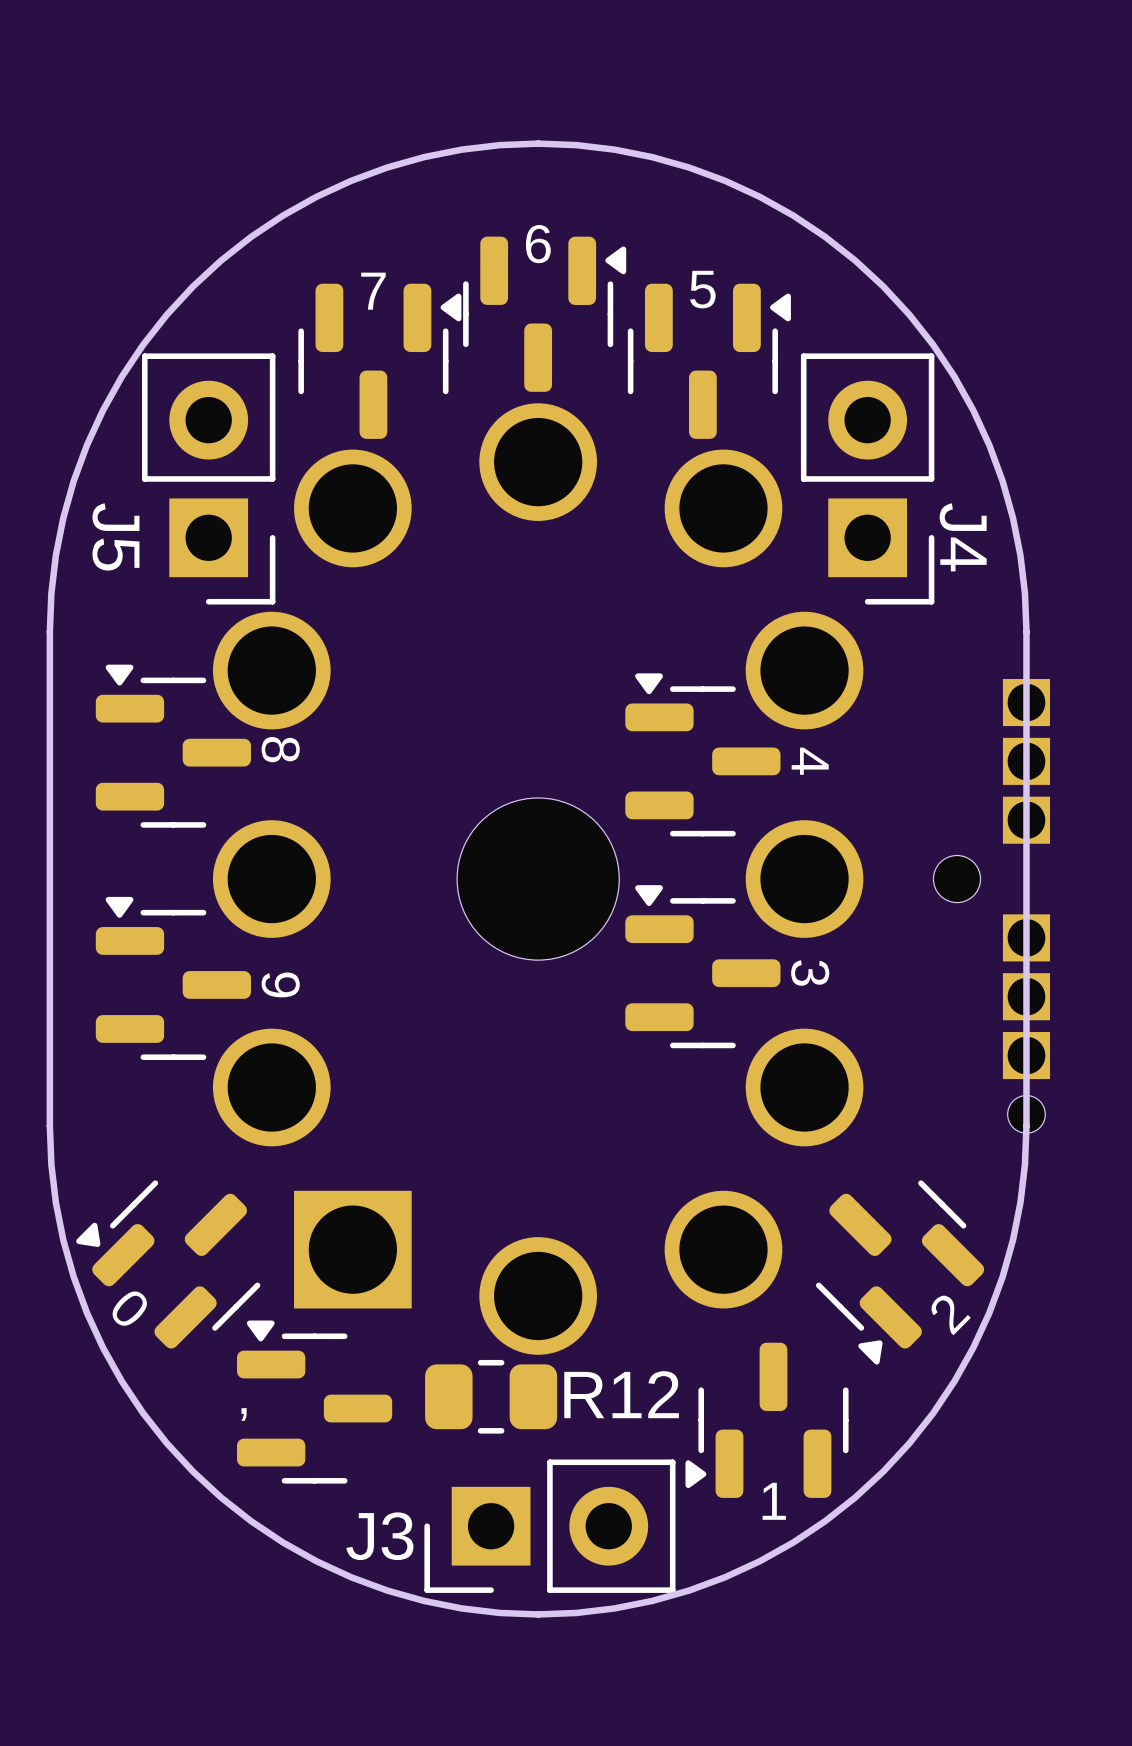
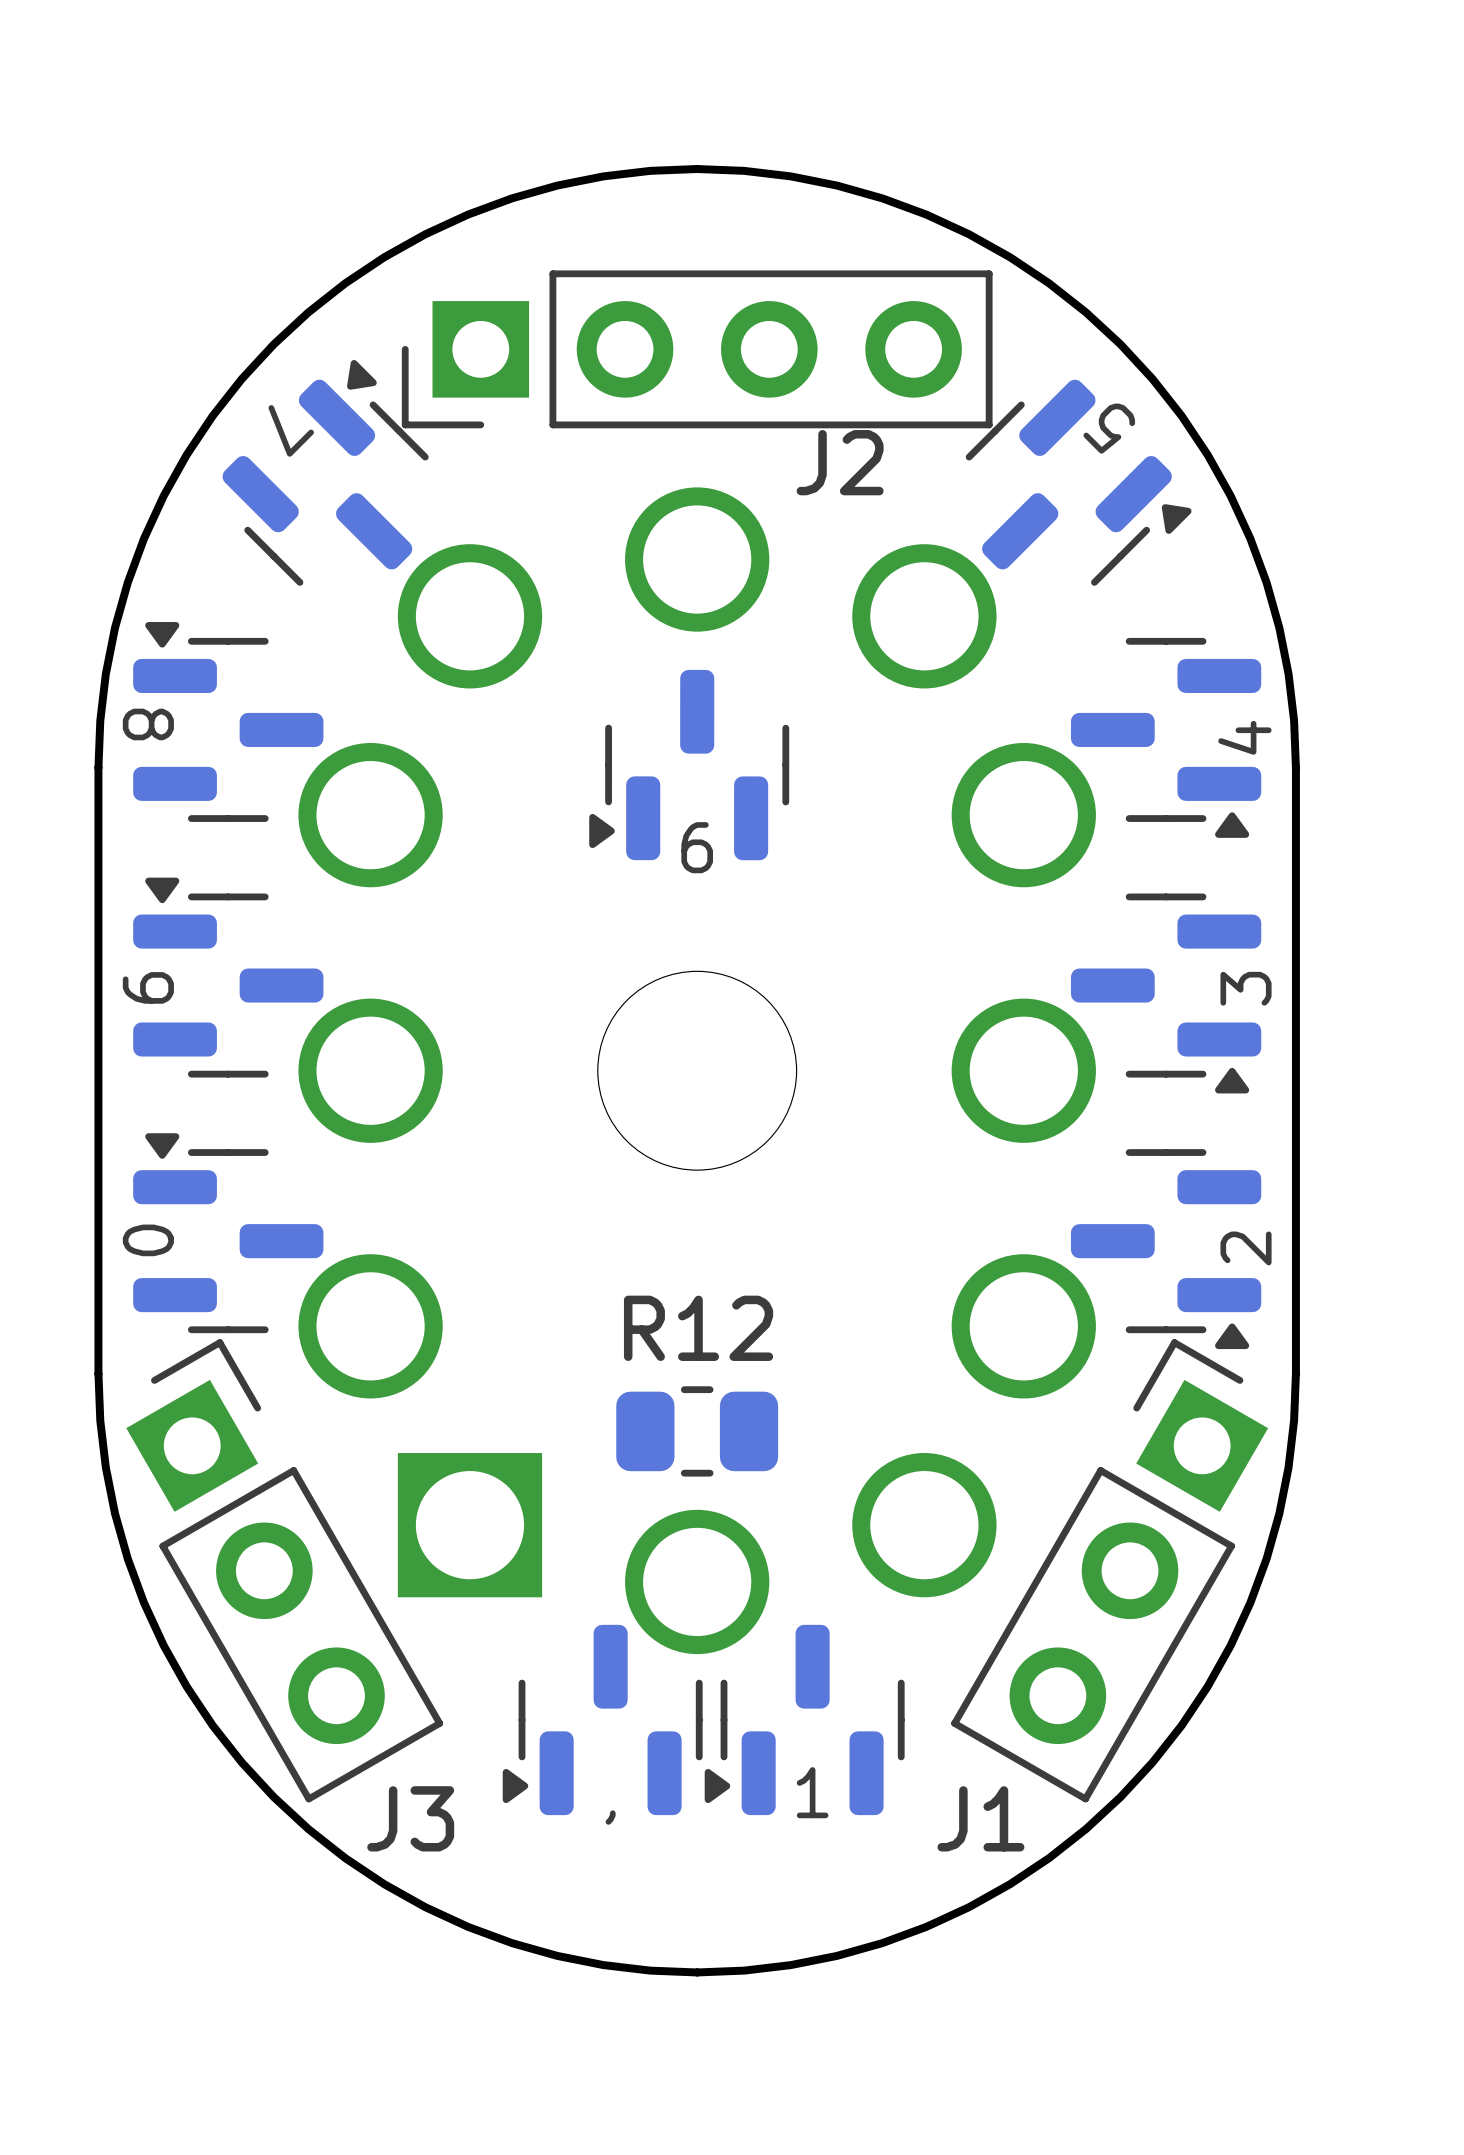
text position: 6 (538, 244) -> 6 (697, 847)
text rotation: 0° (702, 289) -> 135° counterclockwise (1109, 428)
text position: 5 (702, 289) -> 5 (1109, 428)
J2: none -> (697, 349)
text rotation: 0° (373, 291) -> 135° clockwise (291, 430)
text position: 7 (373, 291) -> 7 (291, 430)
part: (544, 314) -> none
part: (379, 361) -> none
part: (709, 361) -> none
part: none -> (325, 472)
part: none -> (1078, 482)
J5: (208, 478) -> none
J4: (867, 478) -> none
part: none -> (228, 721)
part: none -> (1166, 737)
part: none -> (689, 765)
part position: (173, 746) -> (228, 977)
text position: 8 (280, 749) -> 8 (148, 724)
part: (702, 754) -> none
text rotation: 0° (810, 761) -> 180° (1244, 737)
text position: 4 (810, 761) -> 4 (1244, 737)
part: none -> (1166, 993)
part: (991, 906) -> none
part: (702, 966) -> none
text rotation: 0° (810, 973) -> 180° (1246, 988)
text position: 3 (810, 973) -> 3 (1246, 988)
part position: (173, 978) -> (228, 1233)
text position: 9 (280, 984) -> 9 (148, 987)
part: none -> (1166, 1249)
part: (168, 1264) -> none
part: (900, 1272) -> none
J1: none -> (1109, 1570)
text rotation: 0° (129, 1308) -> 45° clockwise (148, 1240)
text position: 0 (129, 1308) -> 0 (148, 1240)
text rotation: 0° (950, 1315) -> 45° counterclockwise (1246, 1248)
text position: 2 (950, 1315) -> 2 (1246, 1248)
R12 name position: R12 (621, 1394) -> R12 (698, 1328)
R12 position: (491, 1396) -> (697, 1431)
part rotation: 0° (314, 1402) -> 90° counterclockwise (602, 1719)
part position: (314, 1402) -> (602, 1719)
text position: , (244, 1414) -> , (610, 1817)
part position: (767, 1420) -> (804, 1719)
J3 footprint: [424, 1459, 676, 1593] -> [126, 1339, 444, 1803]
text position: 1 (774, 1501) -> 1 (812, 1792)
J3 name position: J3 (379, 1536) -> J3 (410, 1818)

